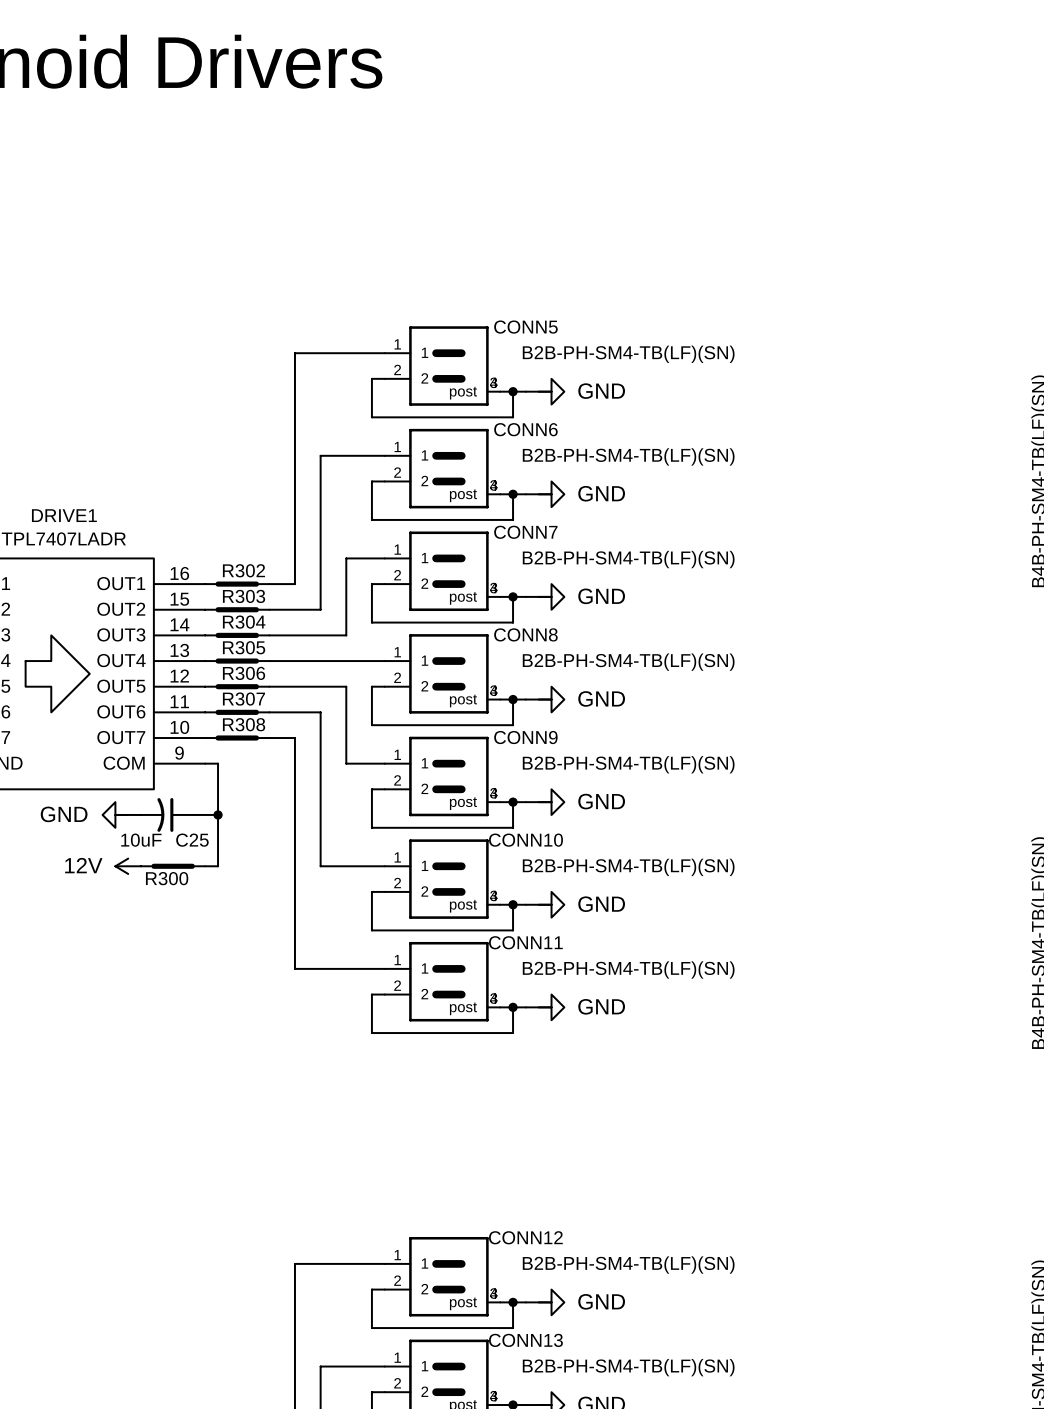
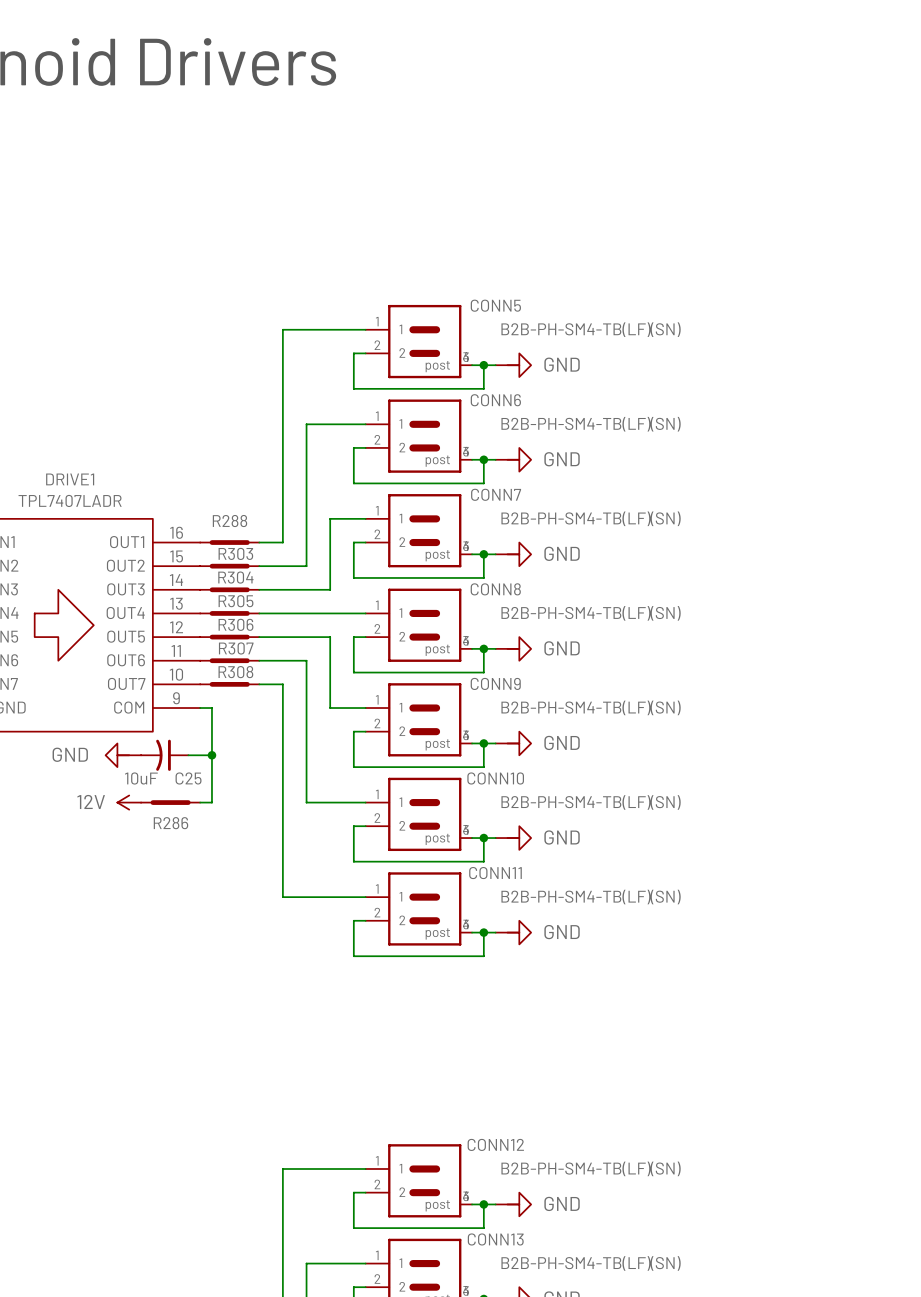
R302 name: R302 (243, 570) -> R288 (229, 521)
R300 name: R300 (167, 878) -> R286 (170, 823)

